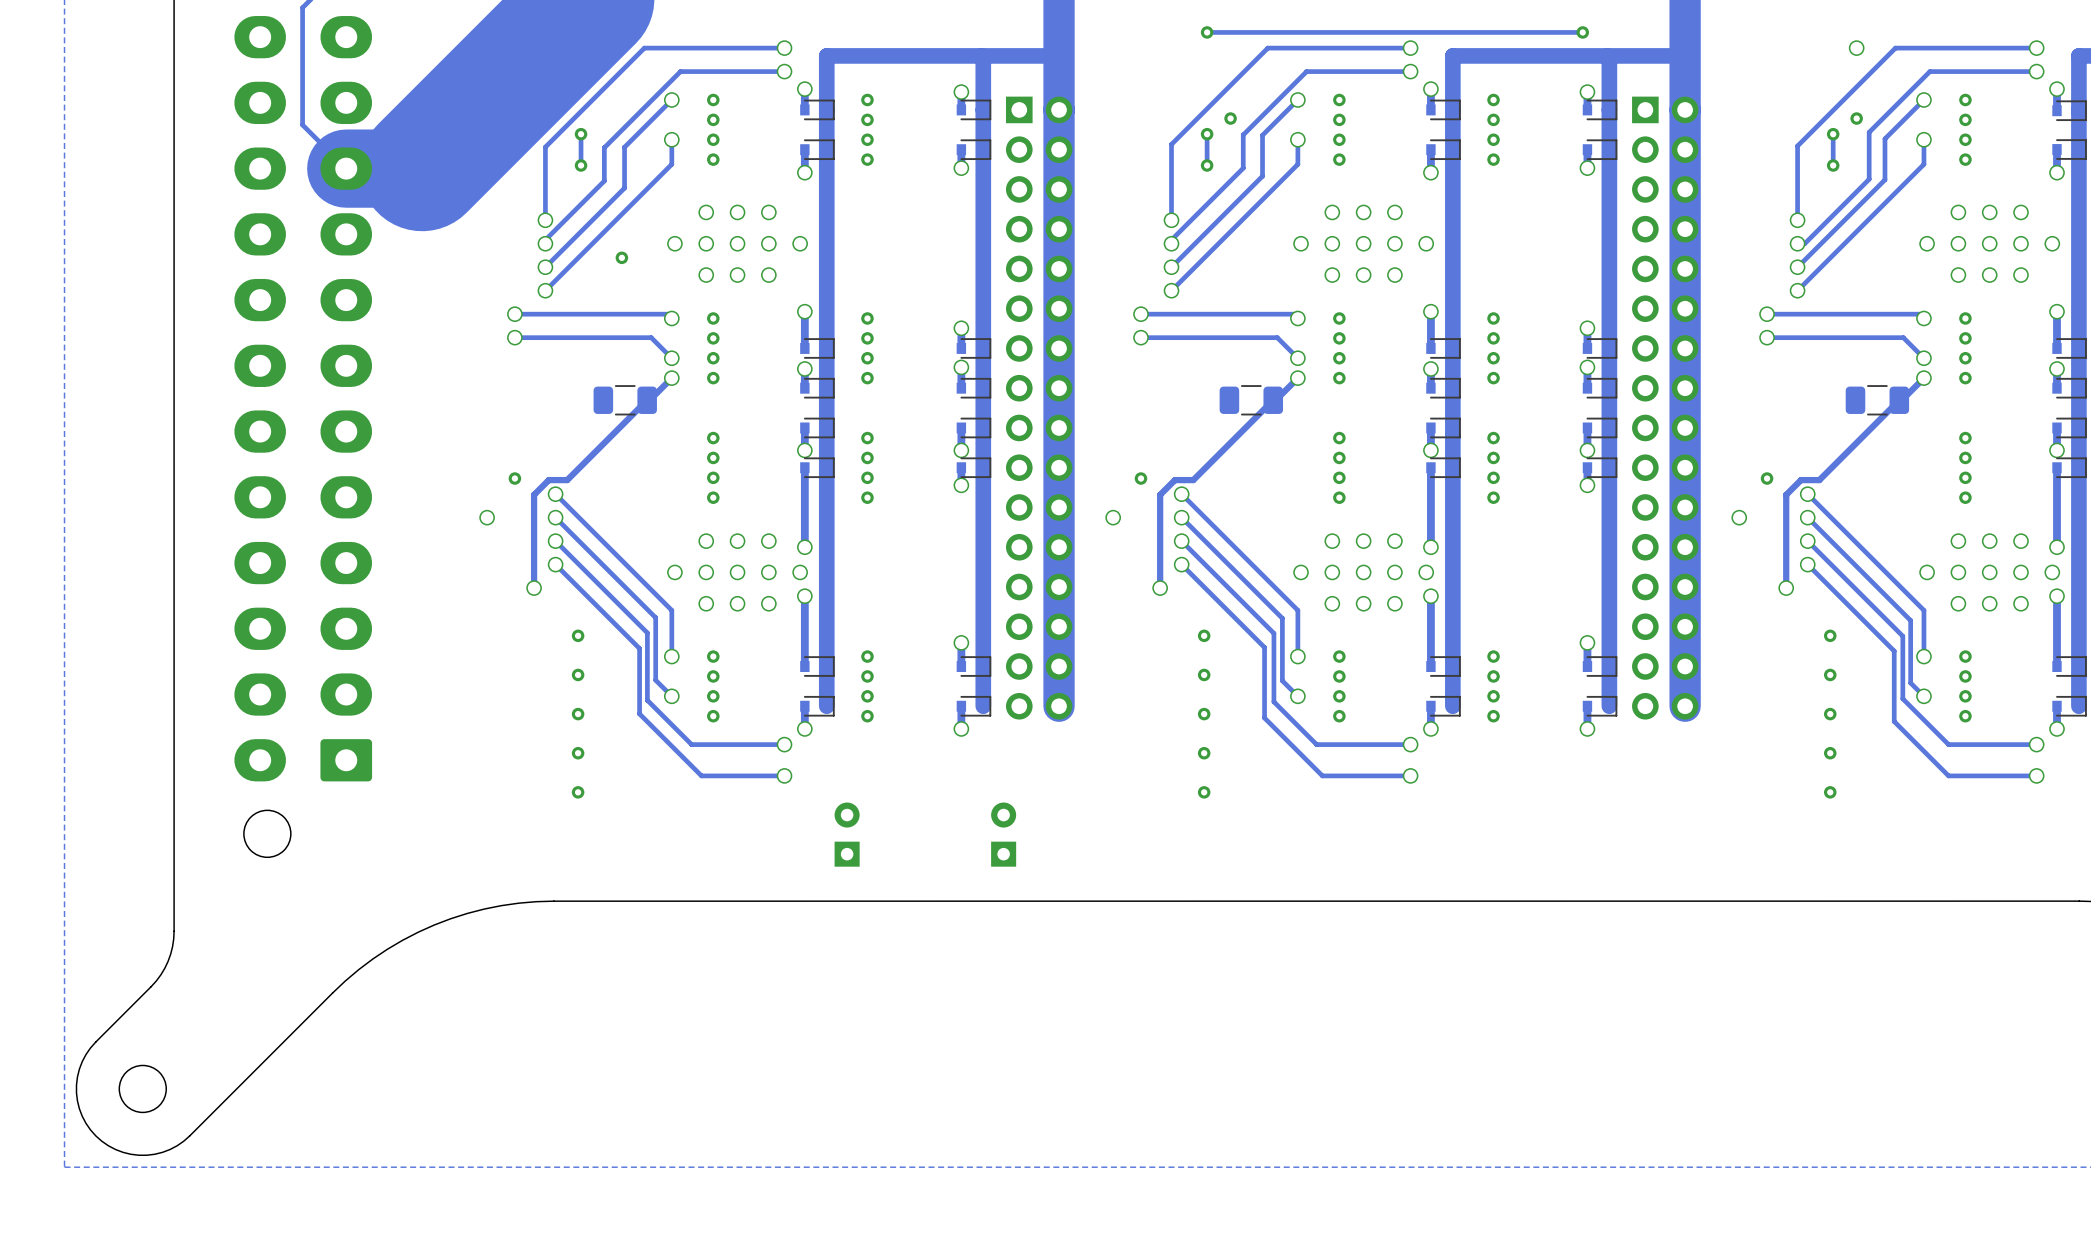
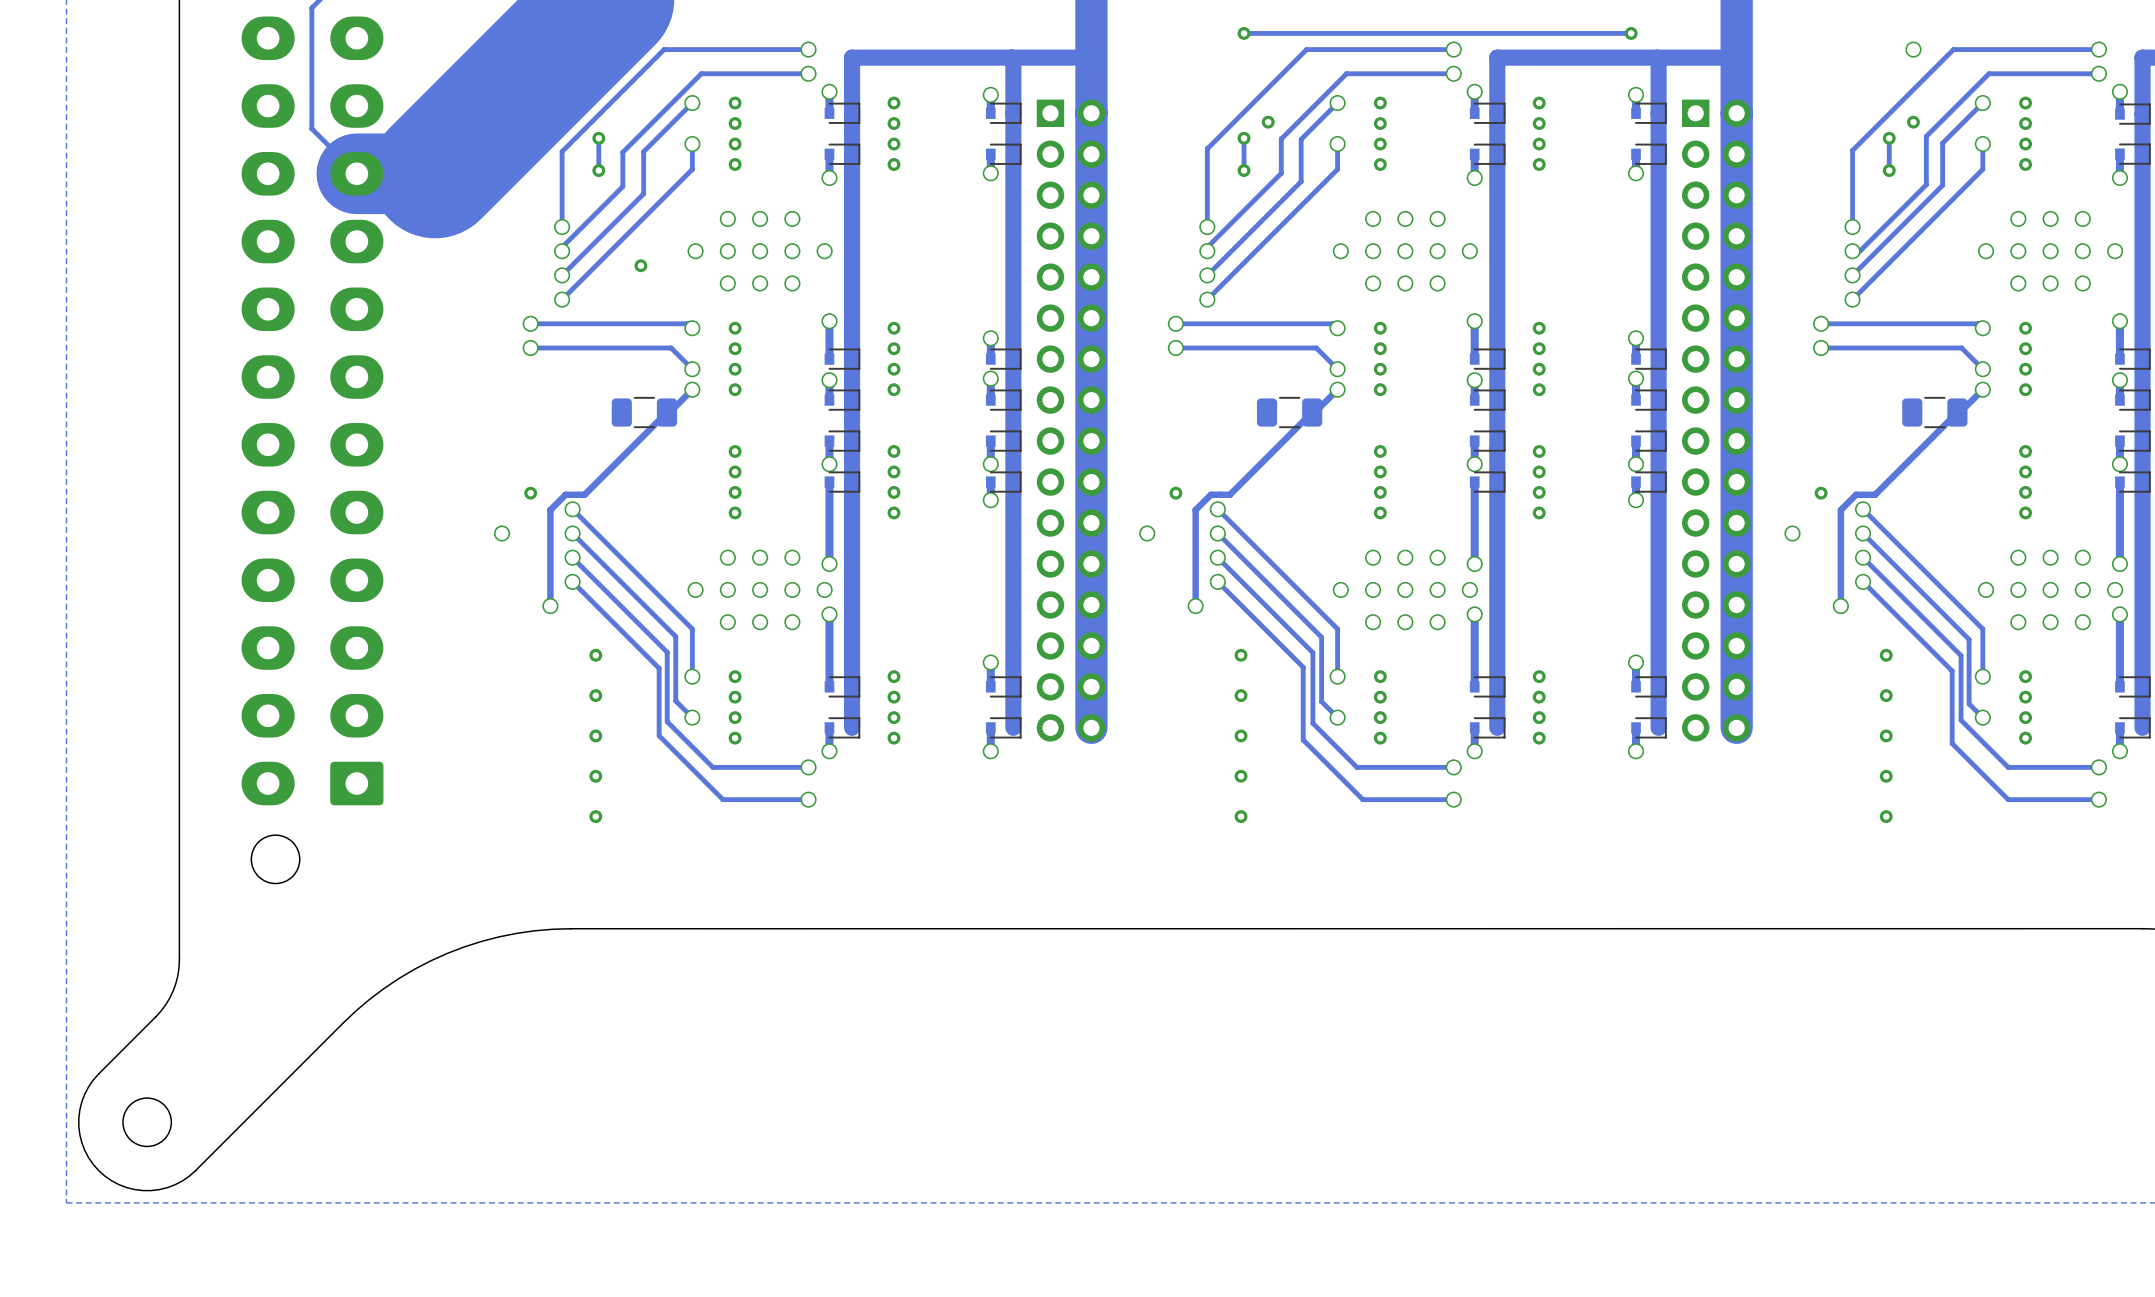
part: (847, 834) -> none
part: (1003, 834) -> none

